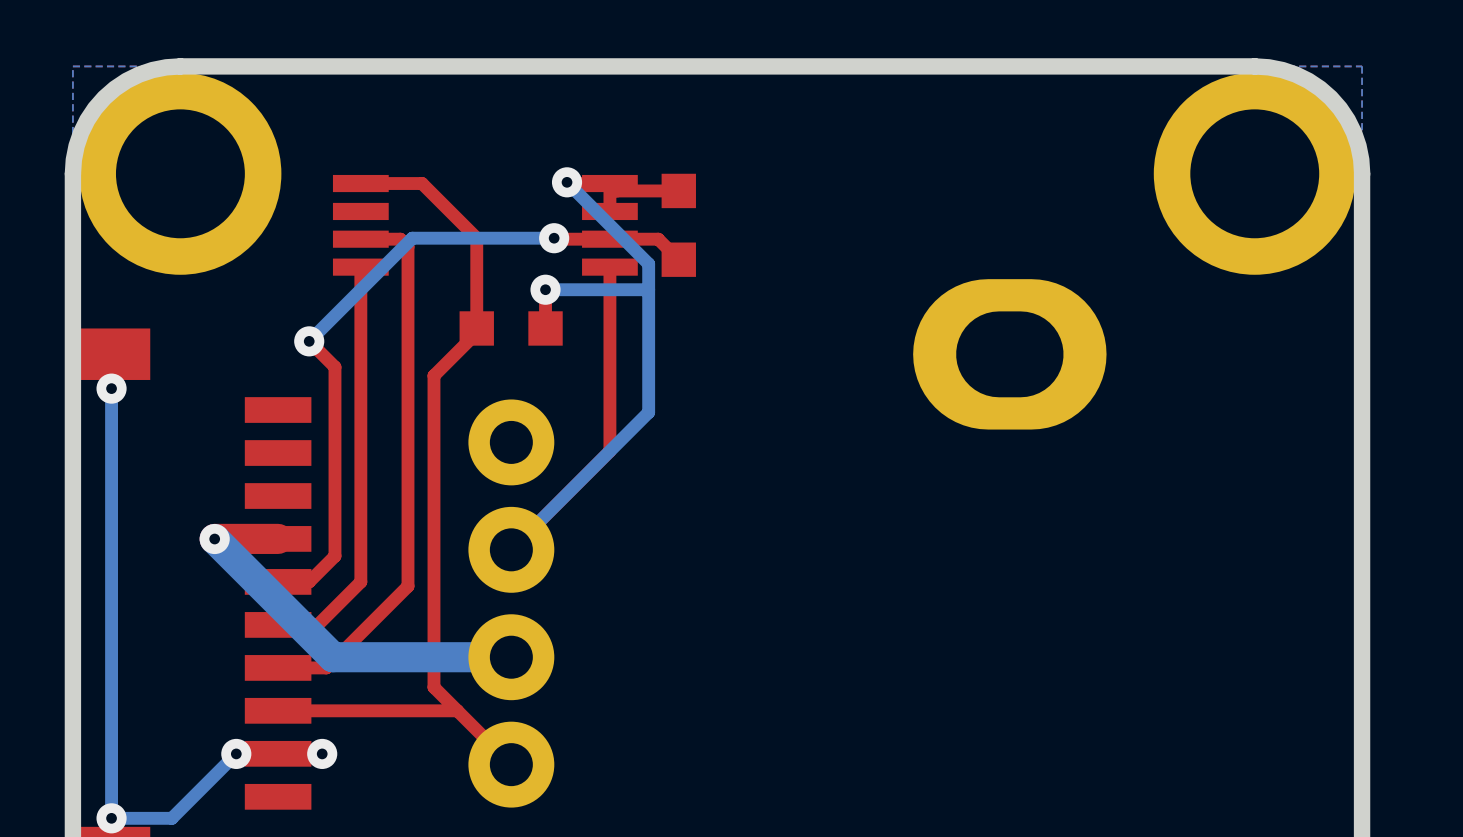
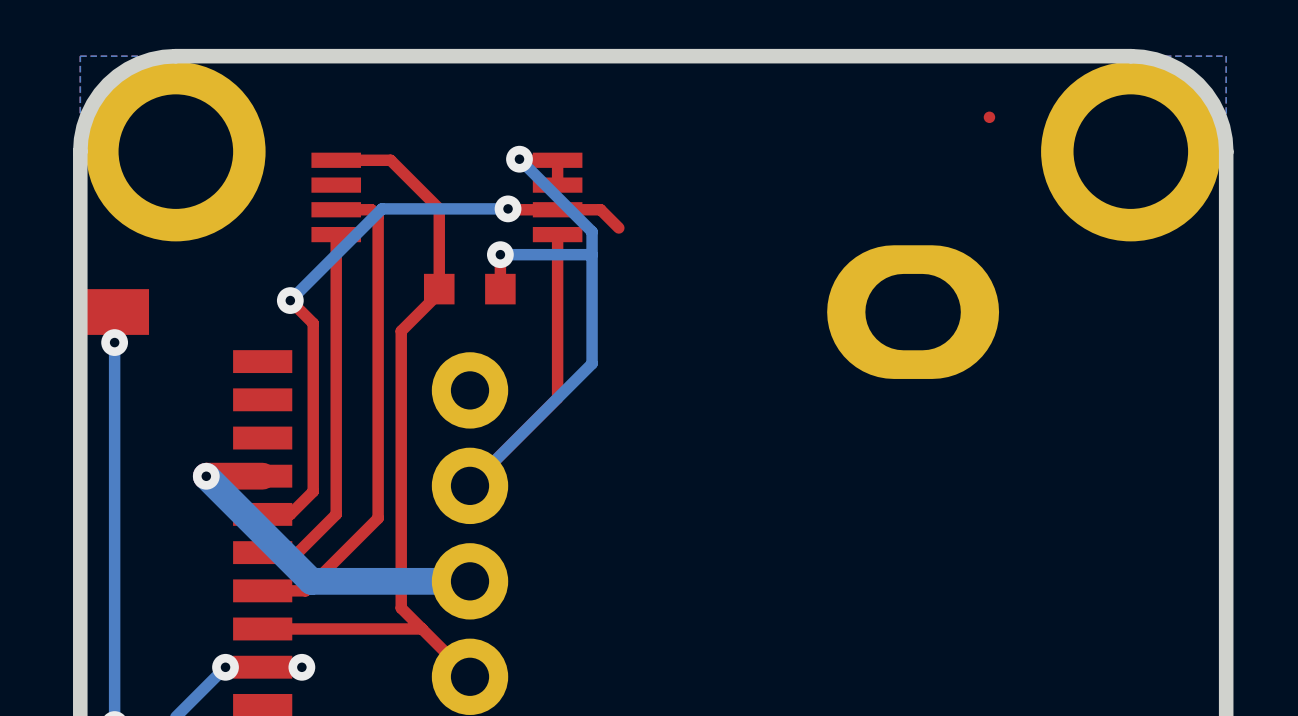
part: none -> (989, 117)
top track: (609, 183) (617, 190) (678, 190) -> none
part: (678, 225) -> none

